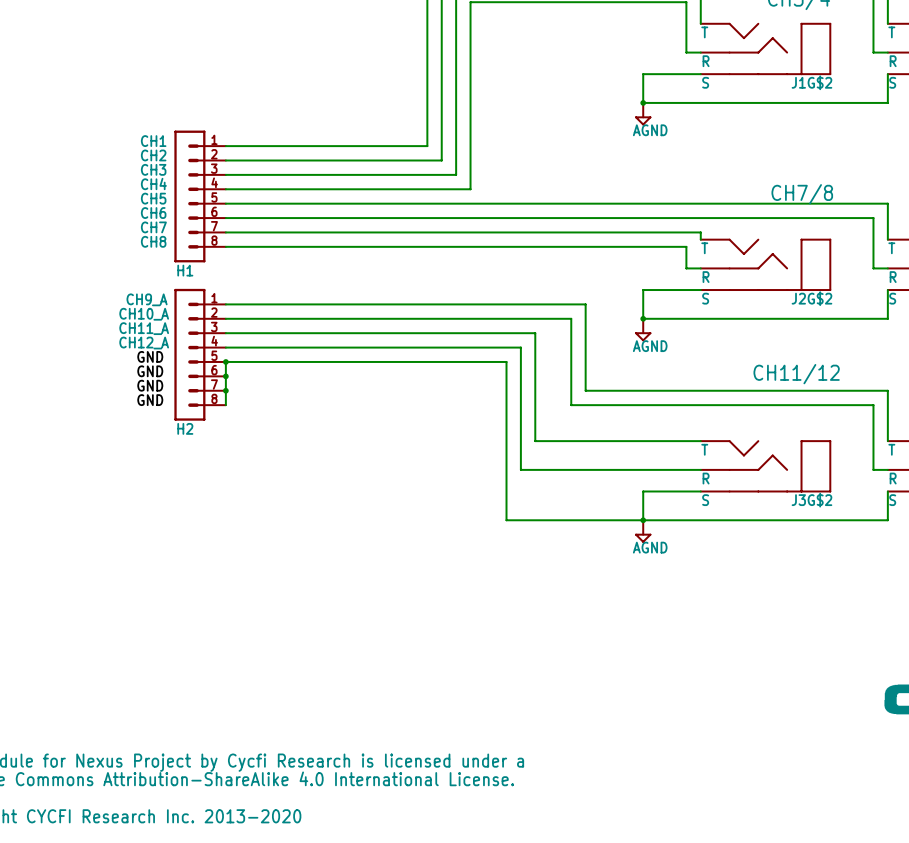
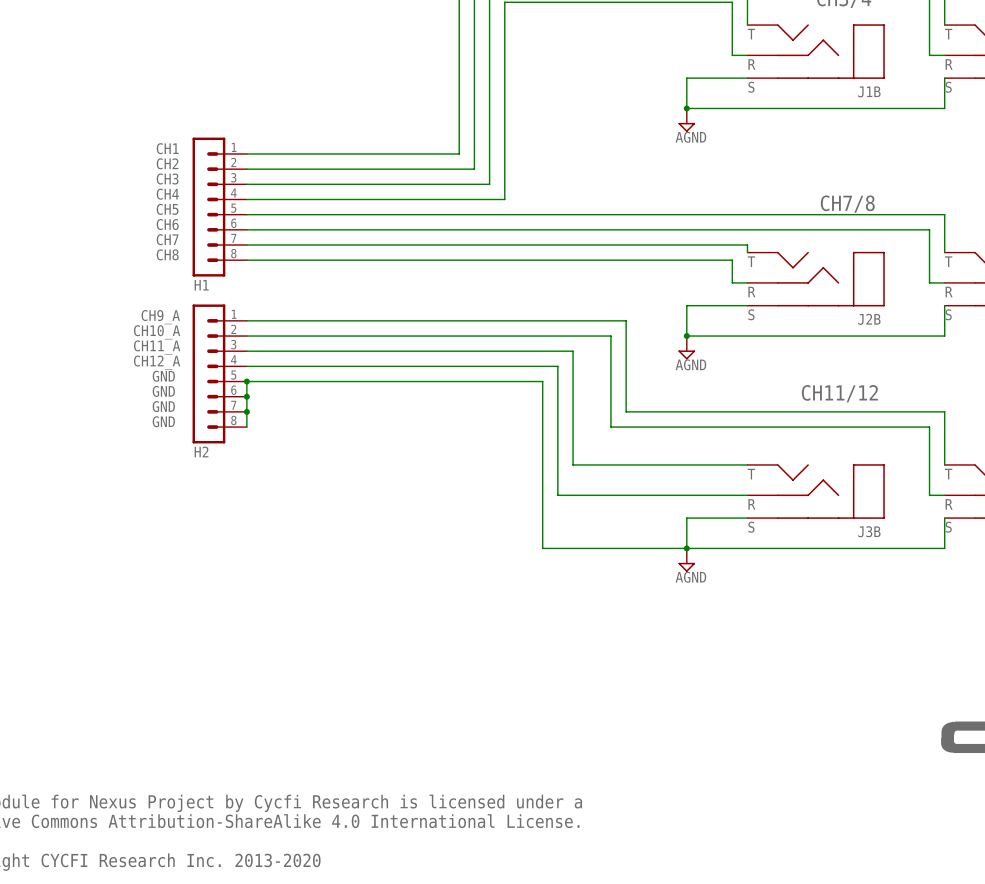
J1G$2 name: J1G$2 (811, 82) -> none
text: none -> J1B (869, 91)
J2G$2 name: J2G$2 (811, 298) -> none
text: none -> J2B (869, 319)
J3G$2 name: J3G$2 (811, 500) -> none
text: none -> J3B (869, 531)

